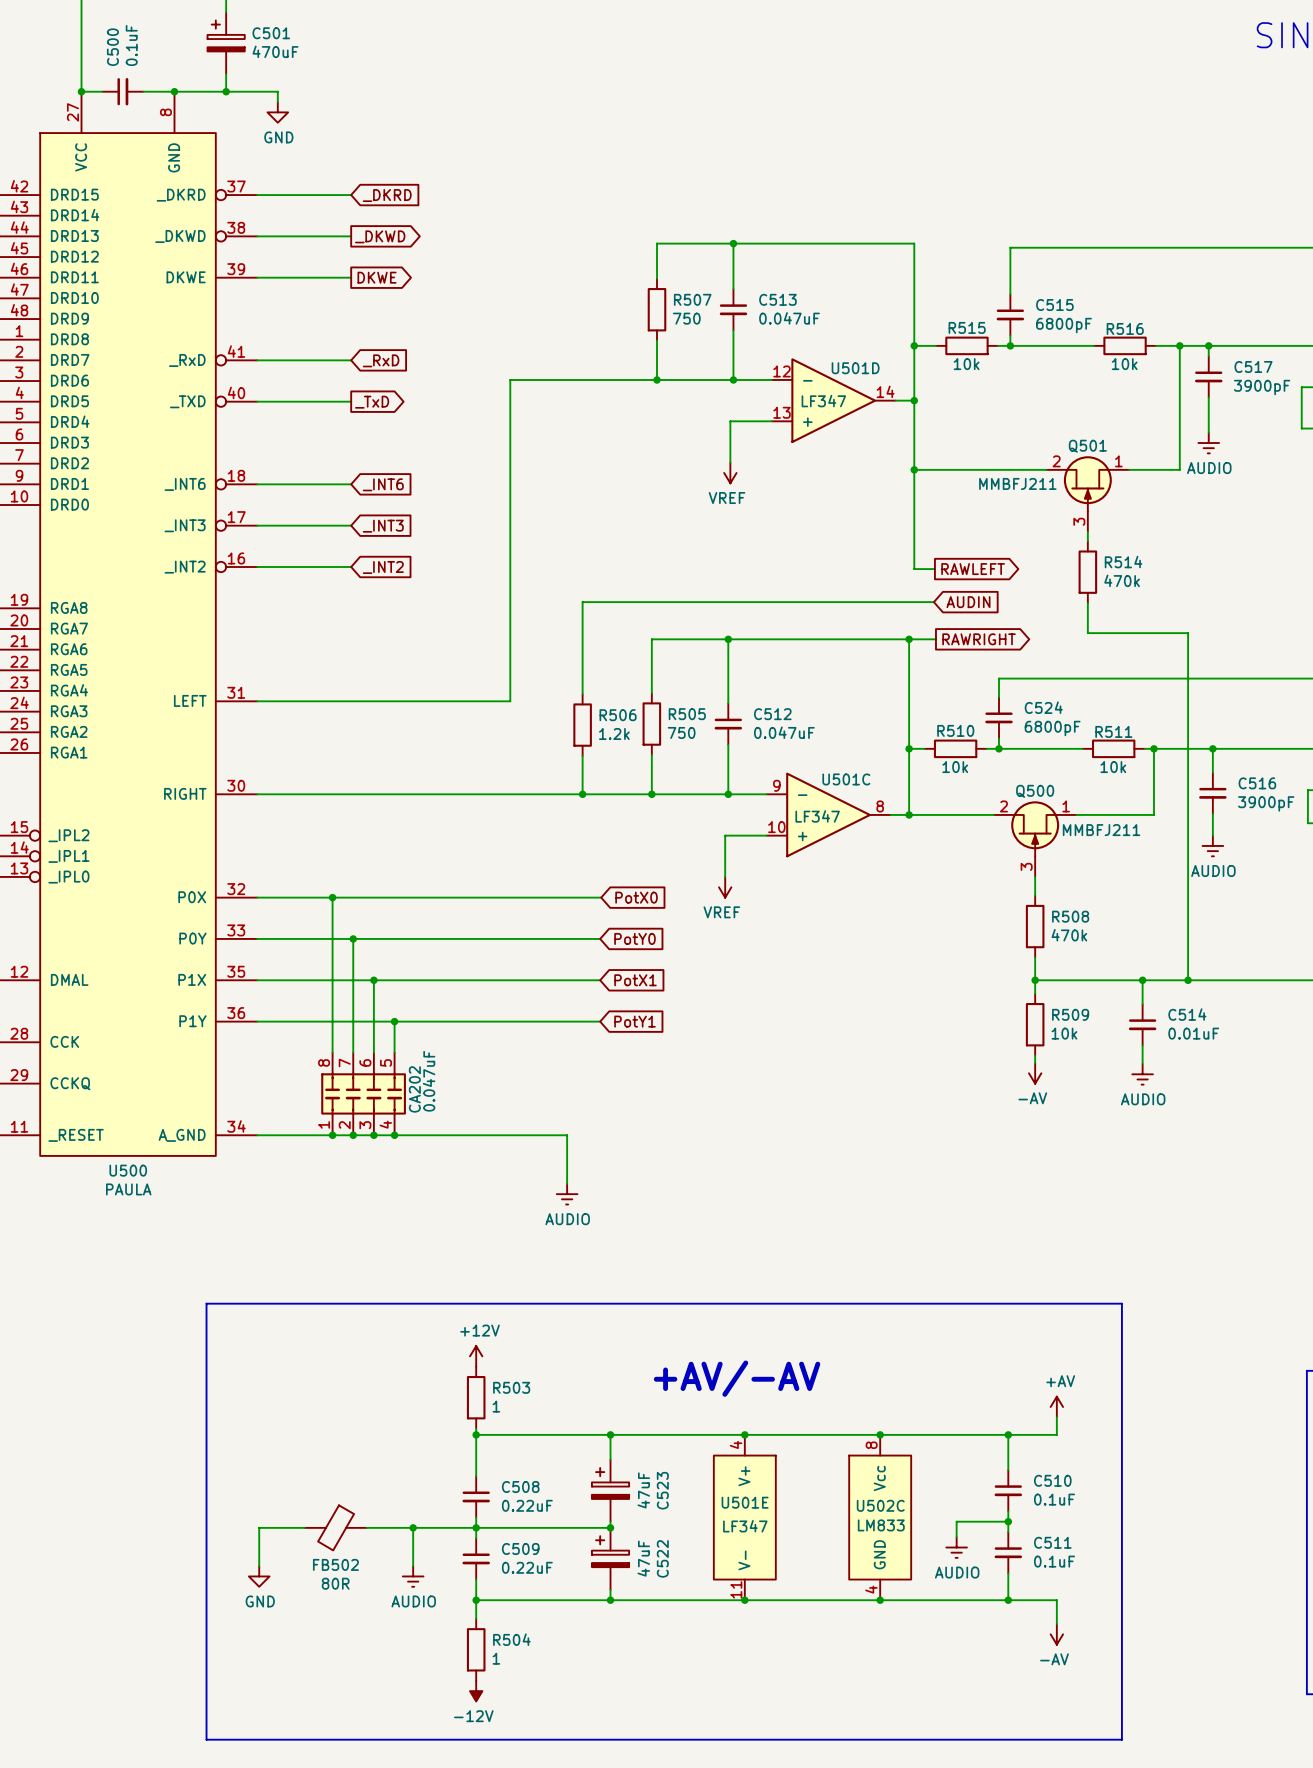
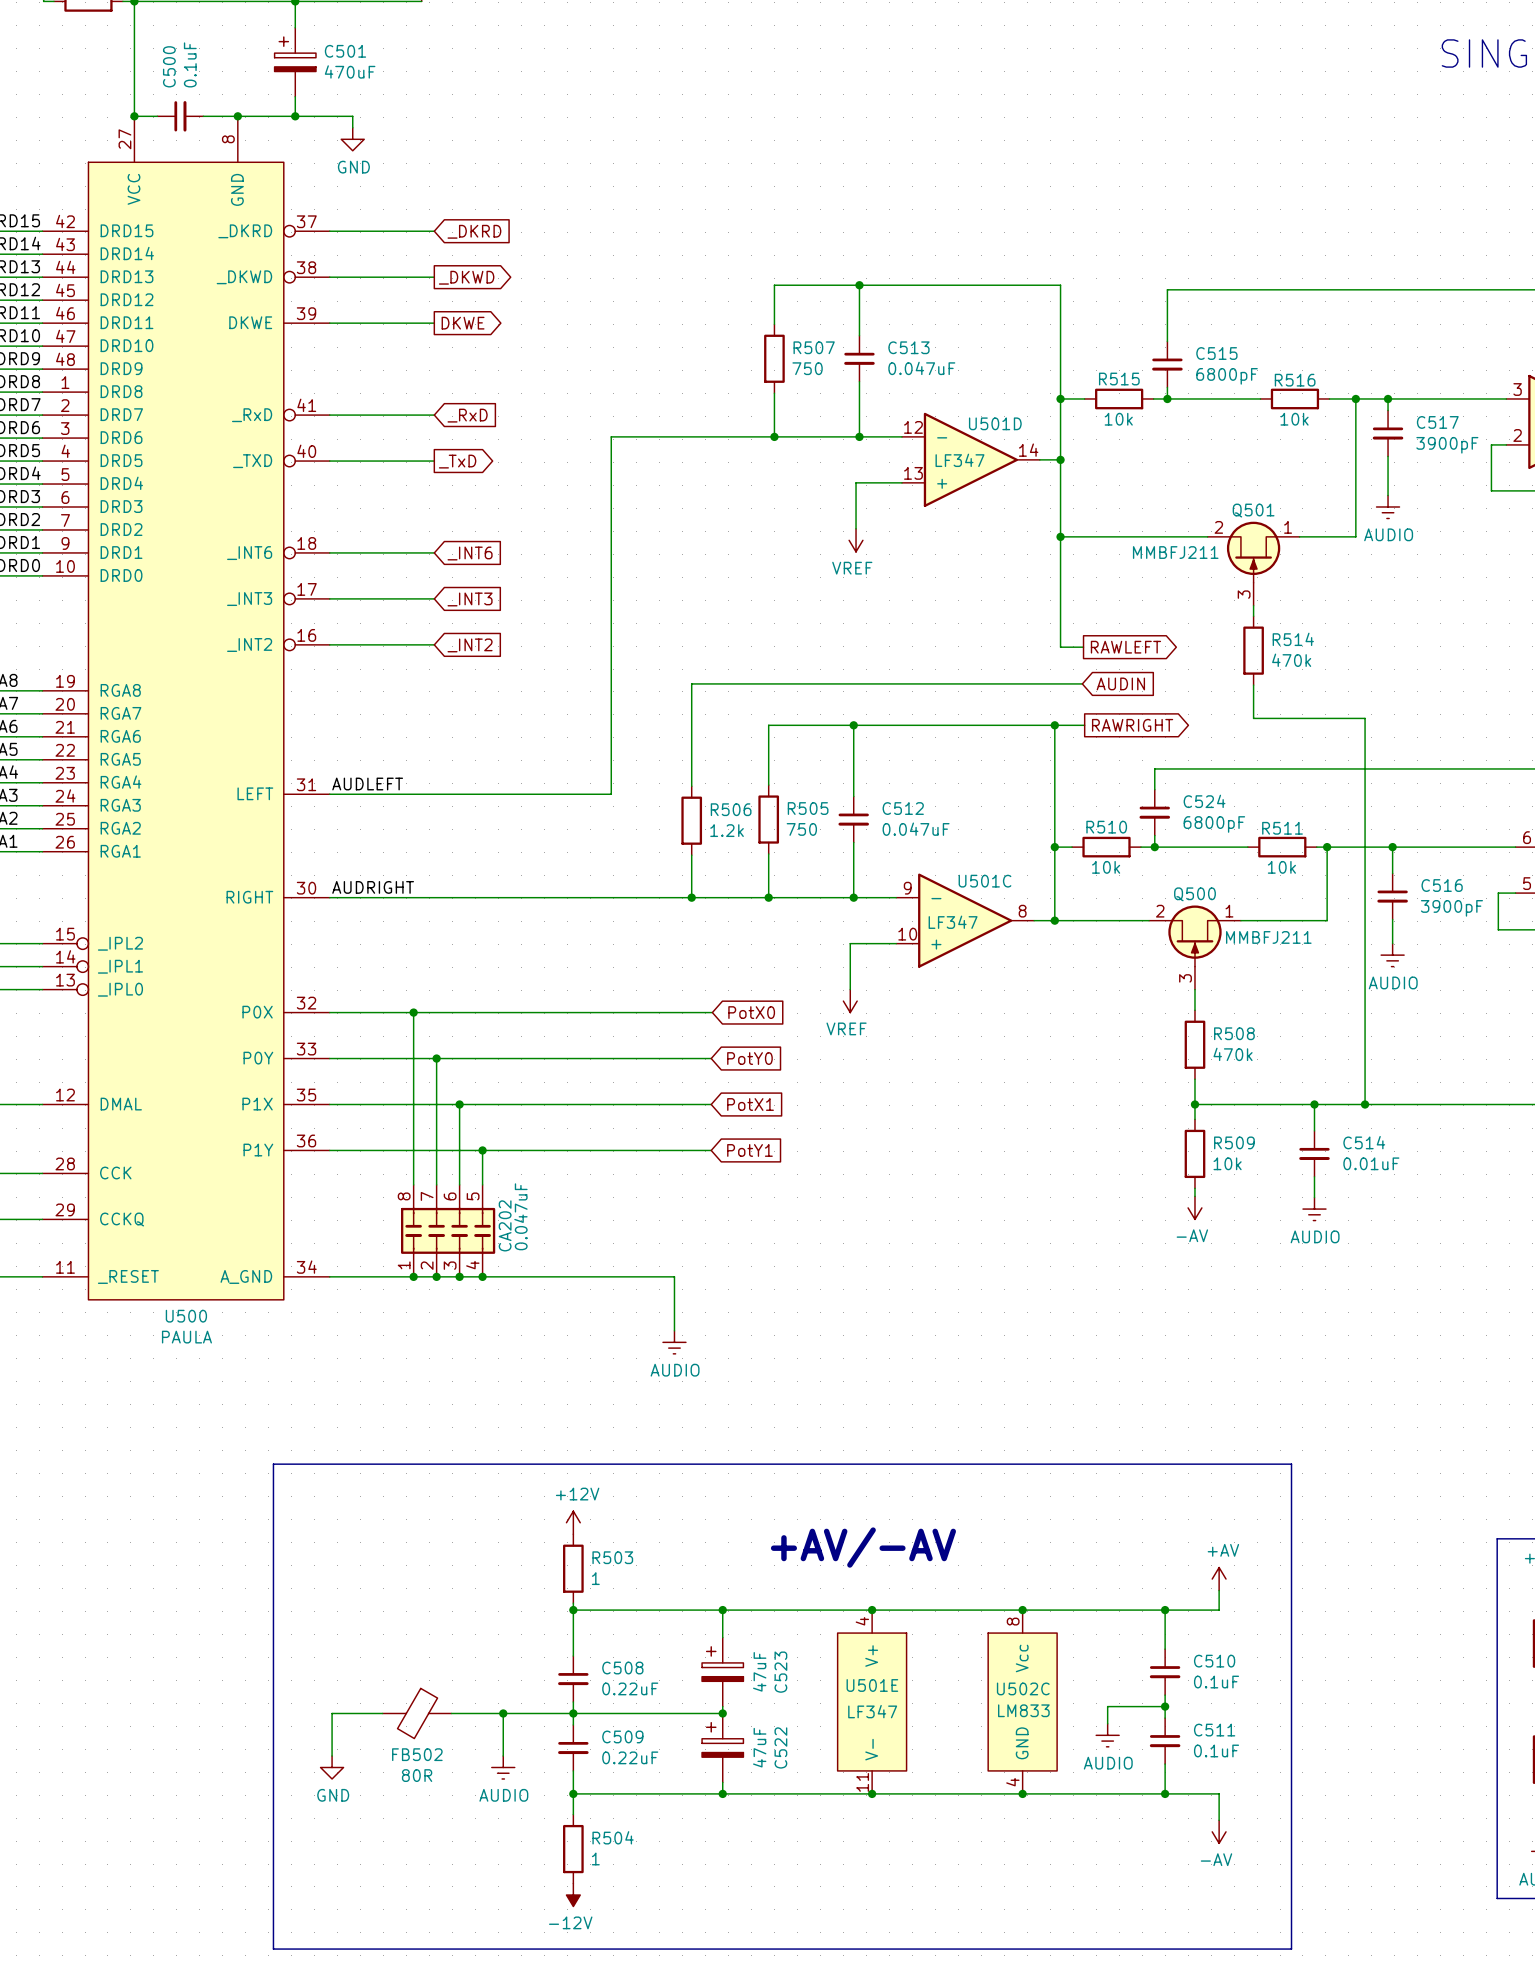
label: none -> AUDLEFT (367, 784)
label: none -> AUDRIGHT (373, 887)

